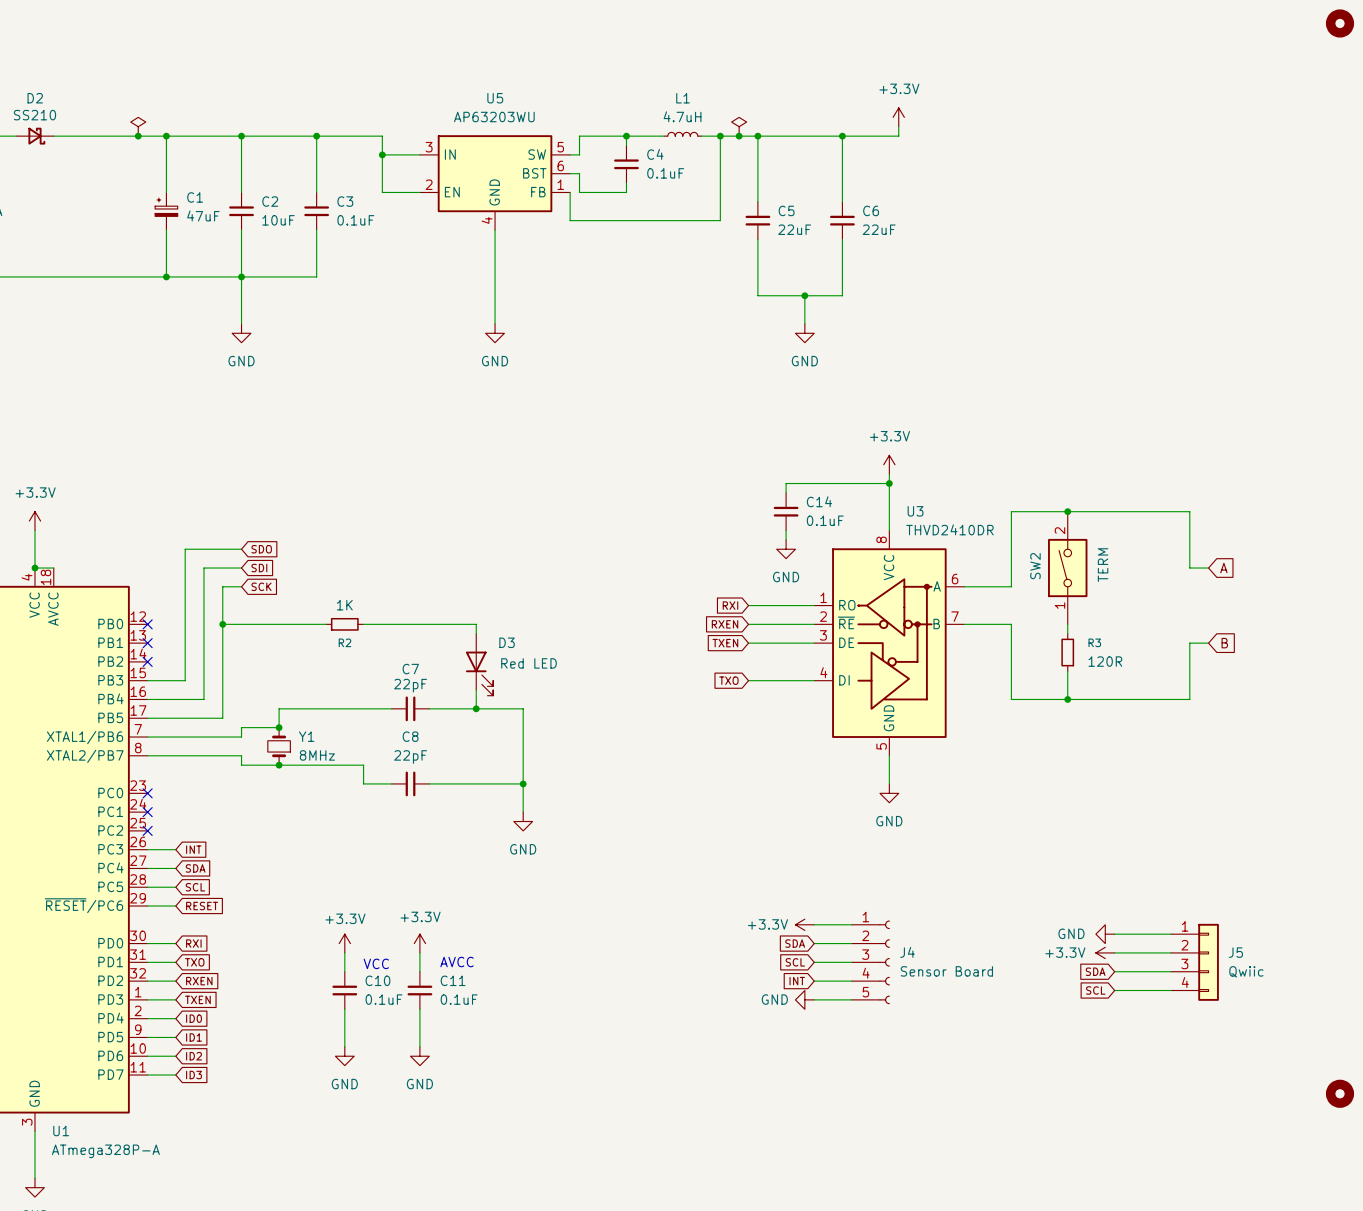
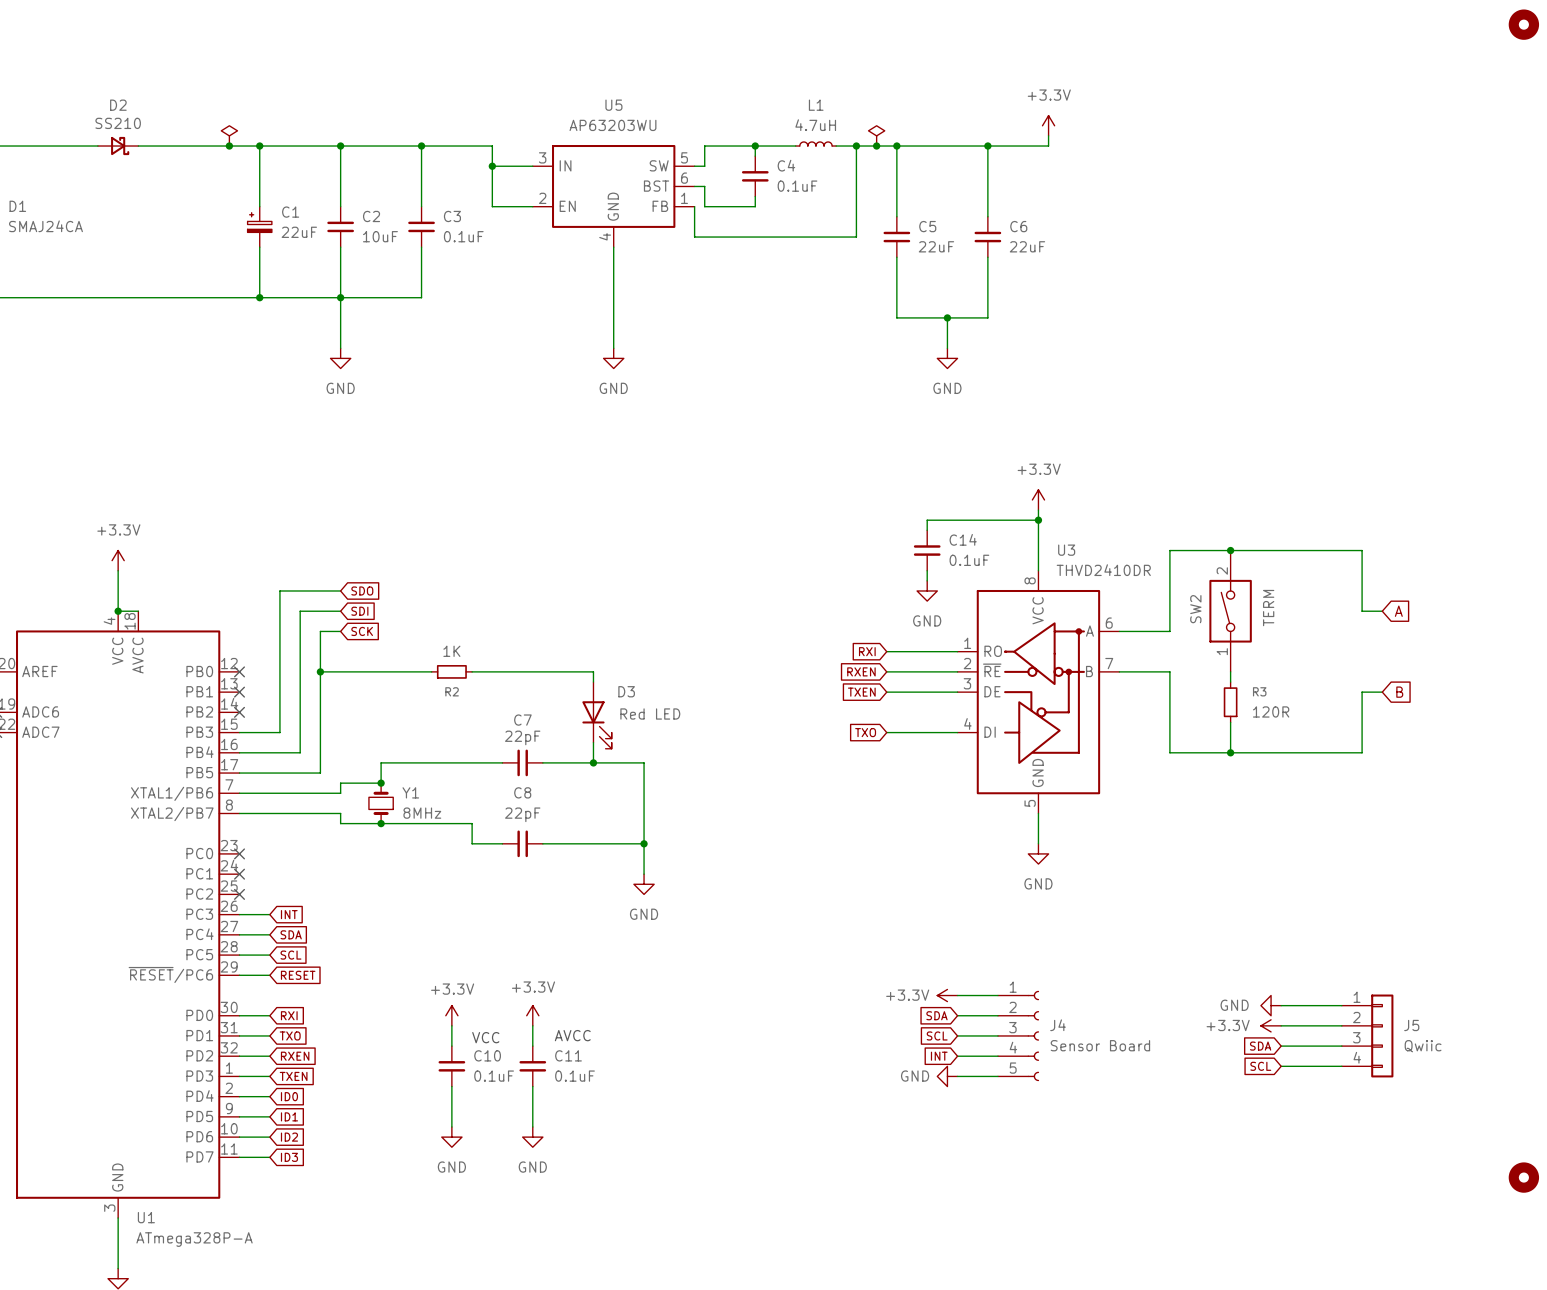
C1 value: 47uF (203, 216) -> 22uF (299, 232)

